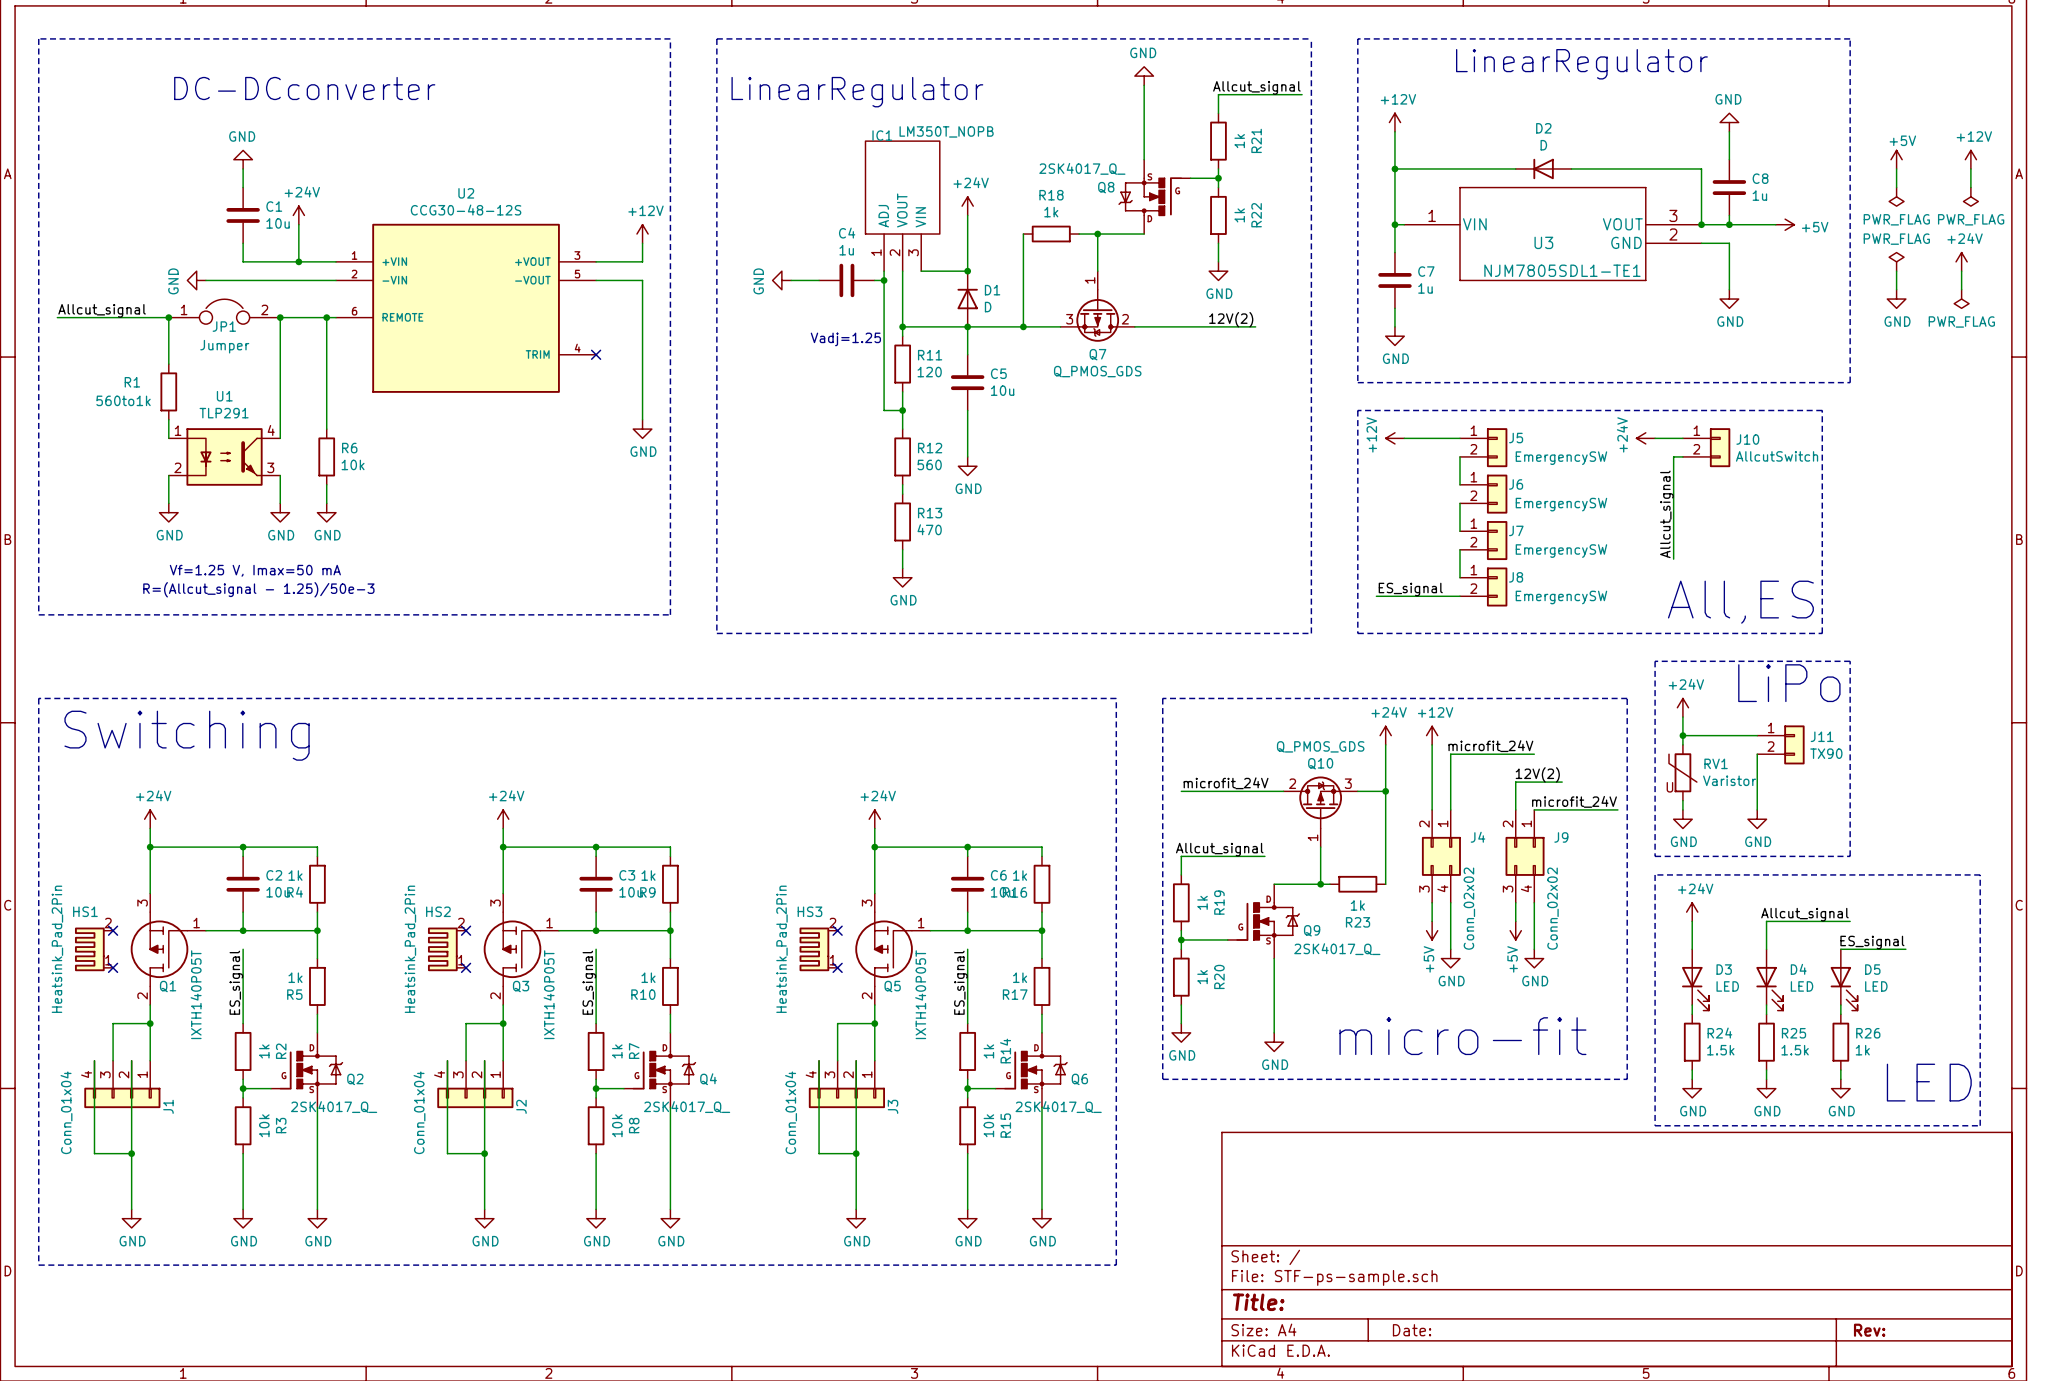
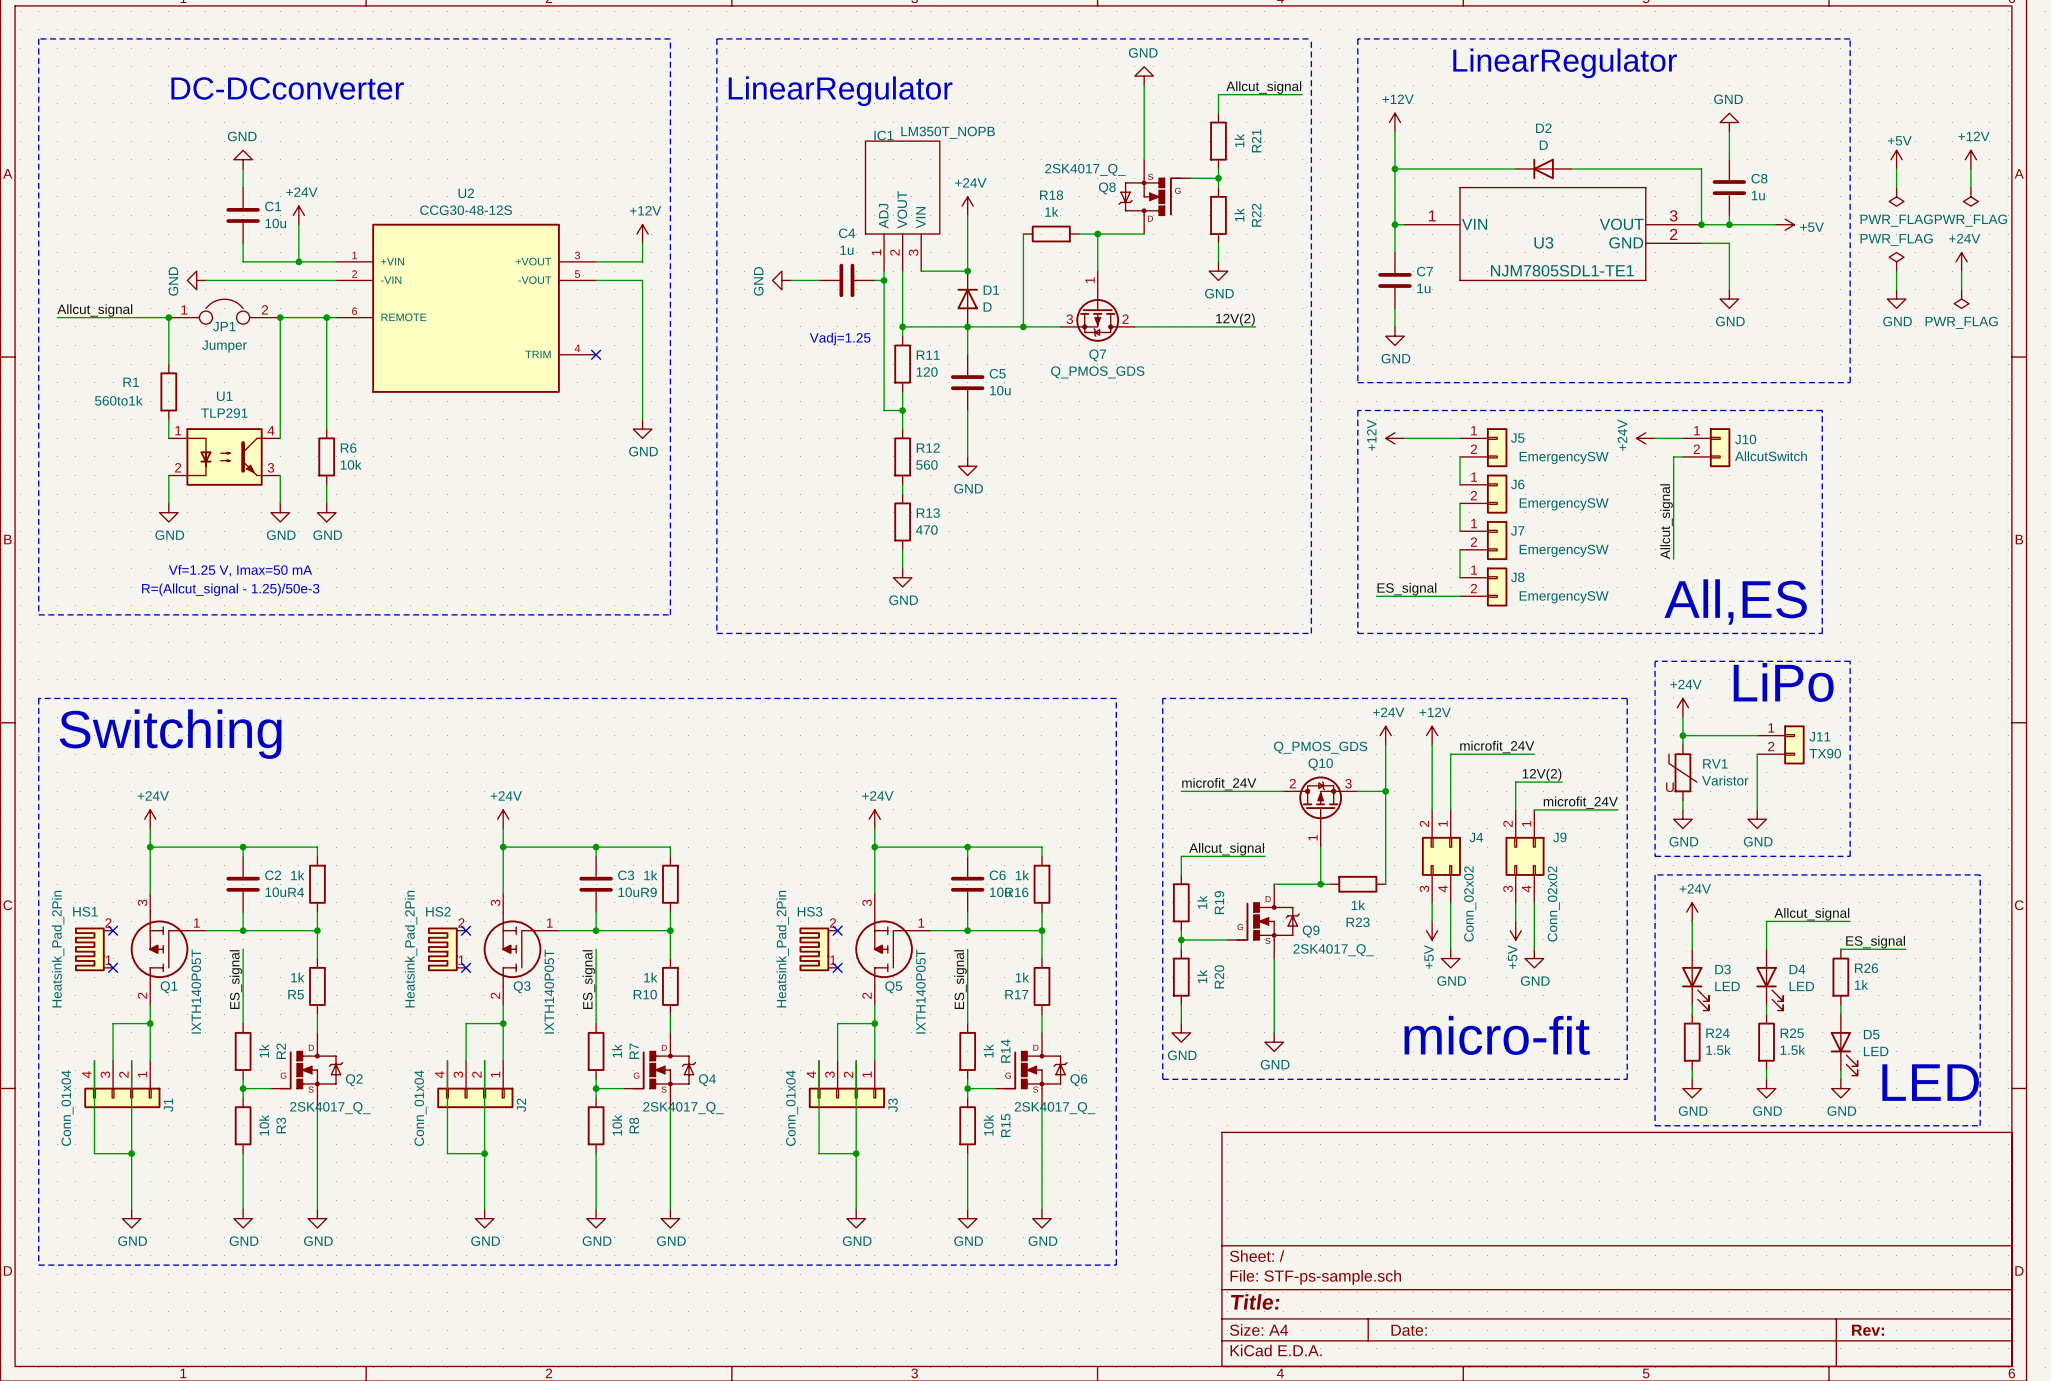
D5 position: (1844, 979) -> (1844, 1044)
R26 position: (1840, 1042) -> (1840, 977)

